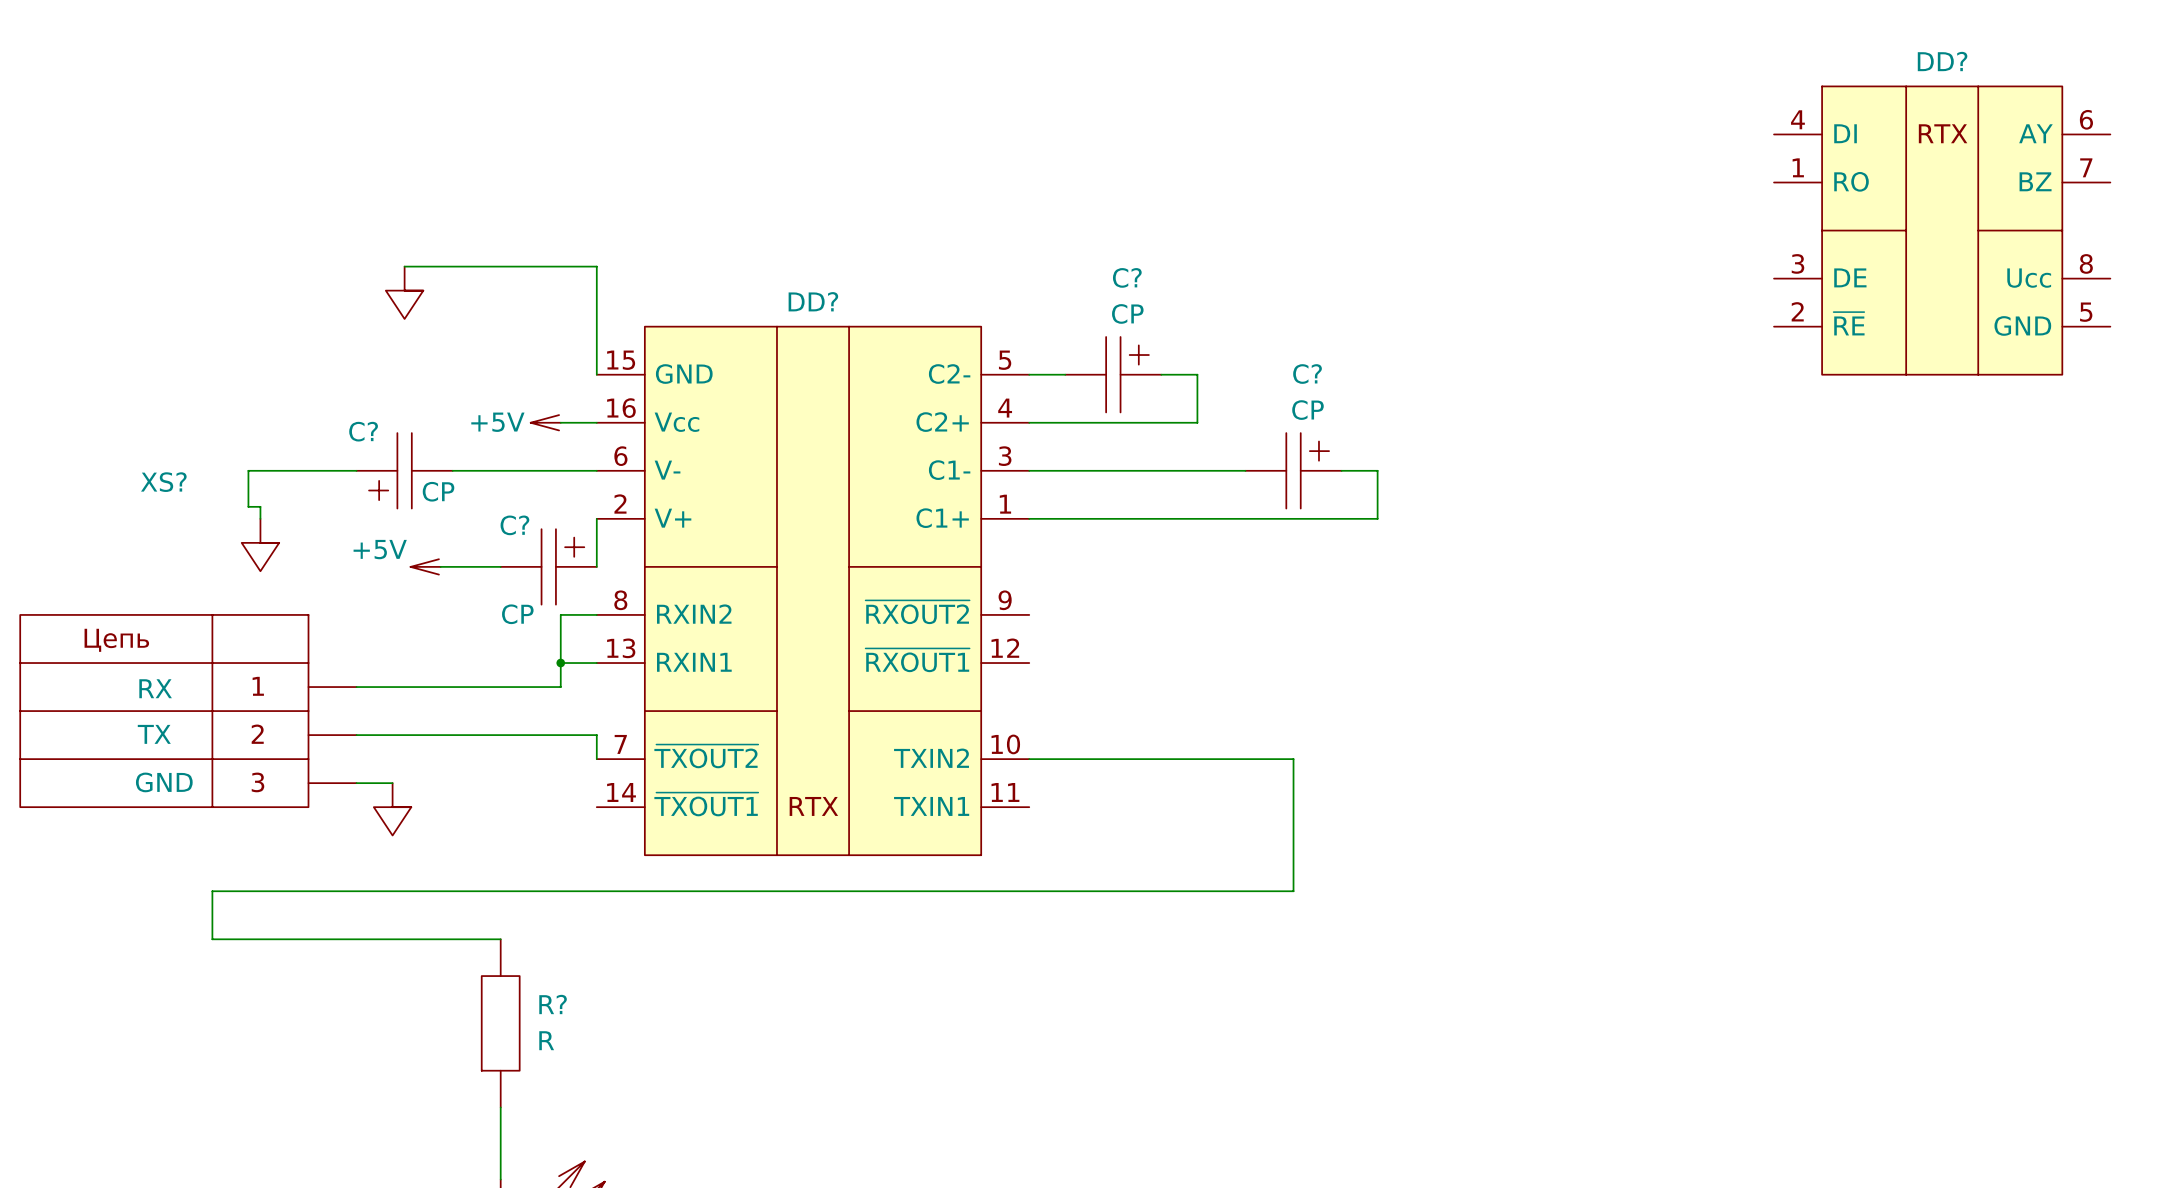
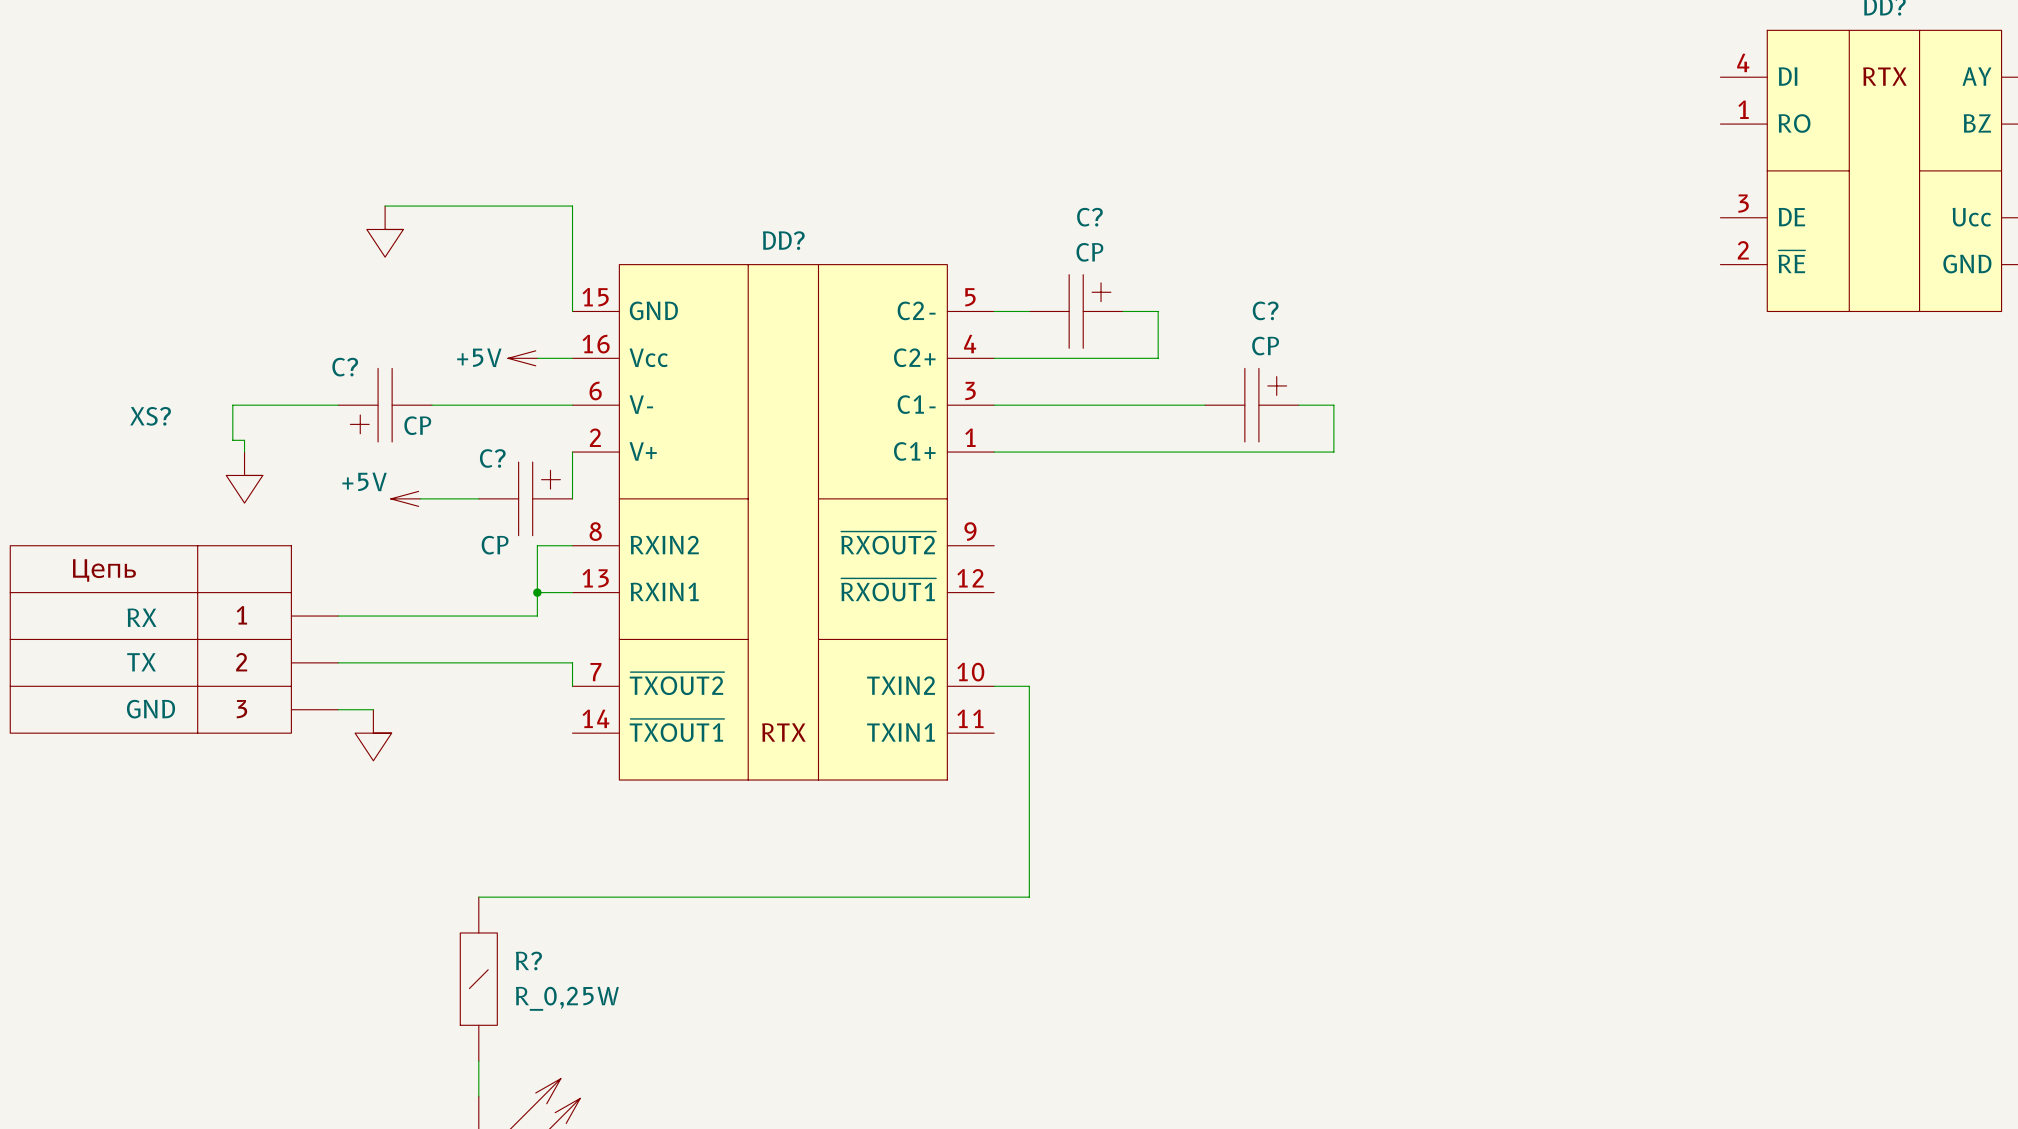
wire: (1065, 759) (1293, 759) (1293, 891) (212, 891) (212, 939) (500, 939) -> (1029, 686) (1029, 897) (478, 897)
R?: R (500, 1023) -> none
R?: none -> R_0,25W (478, 979)

